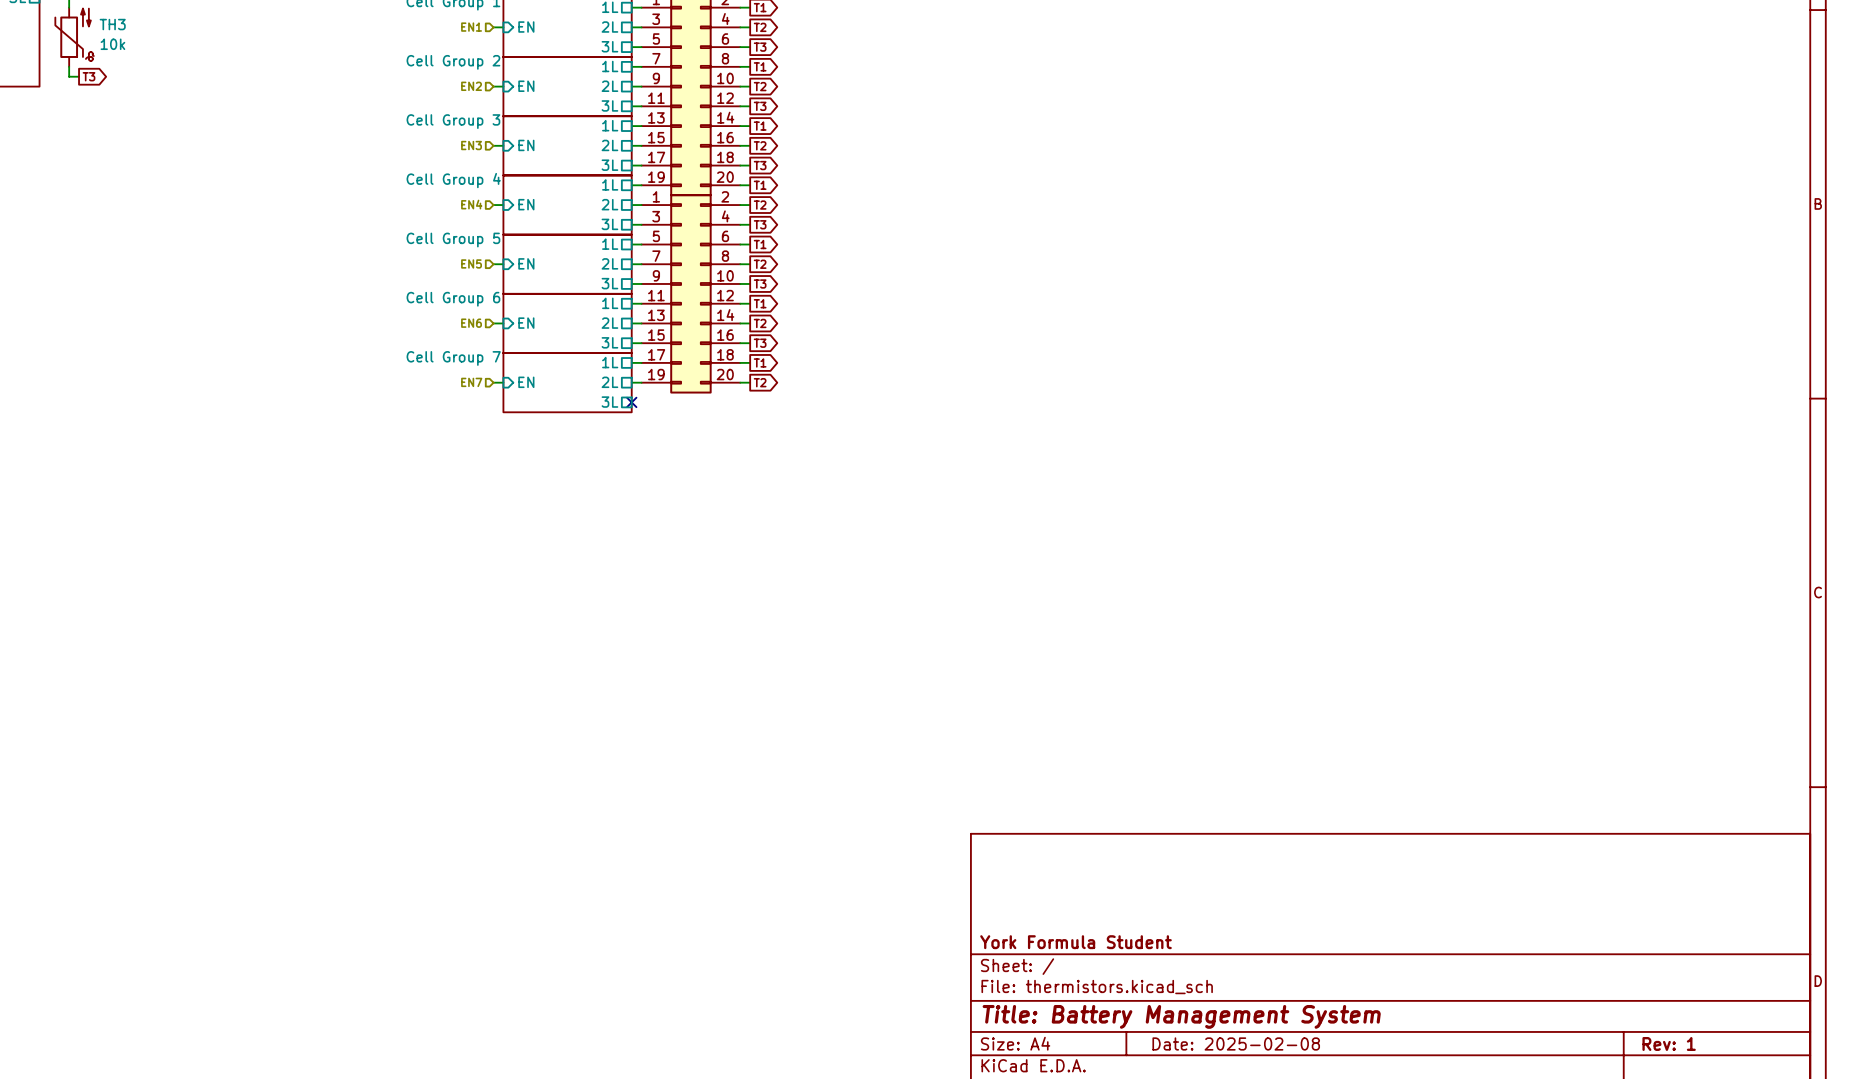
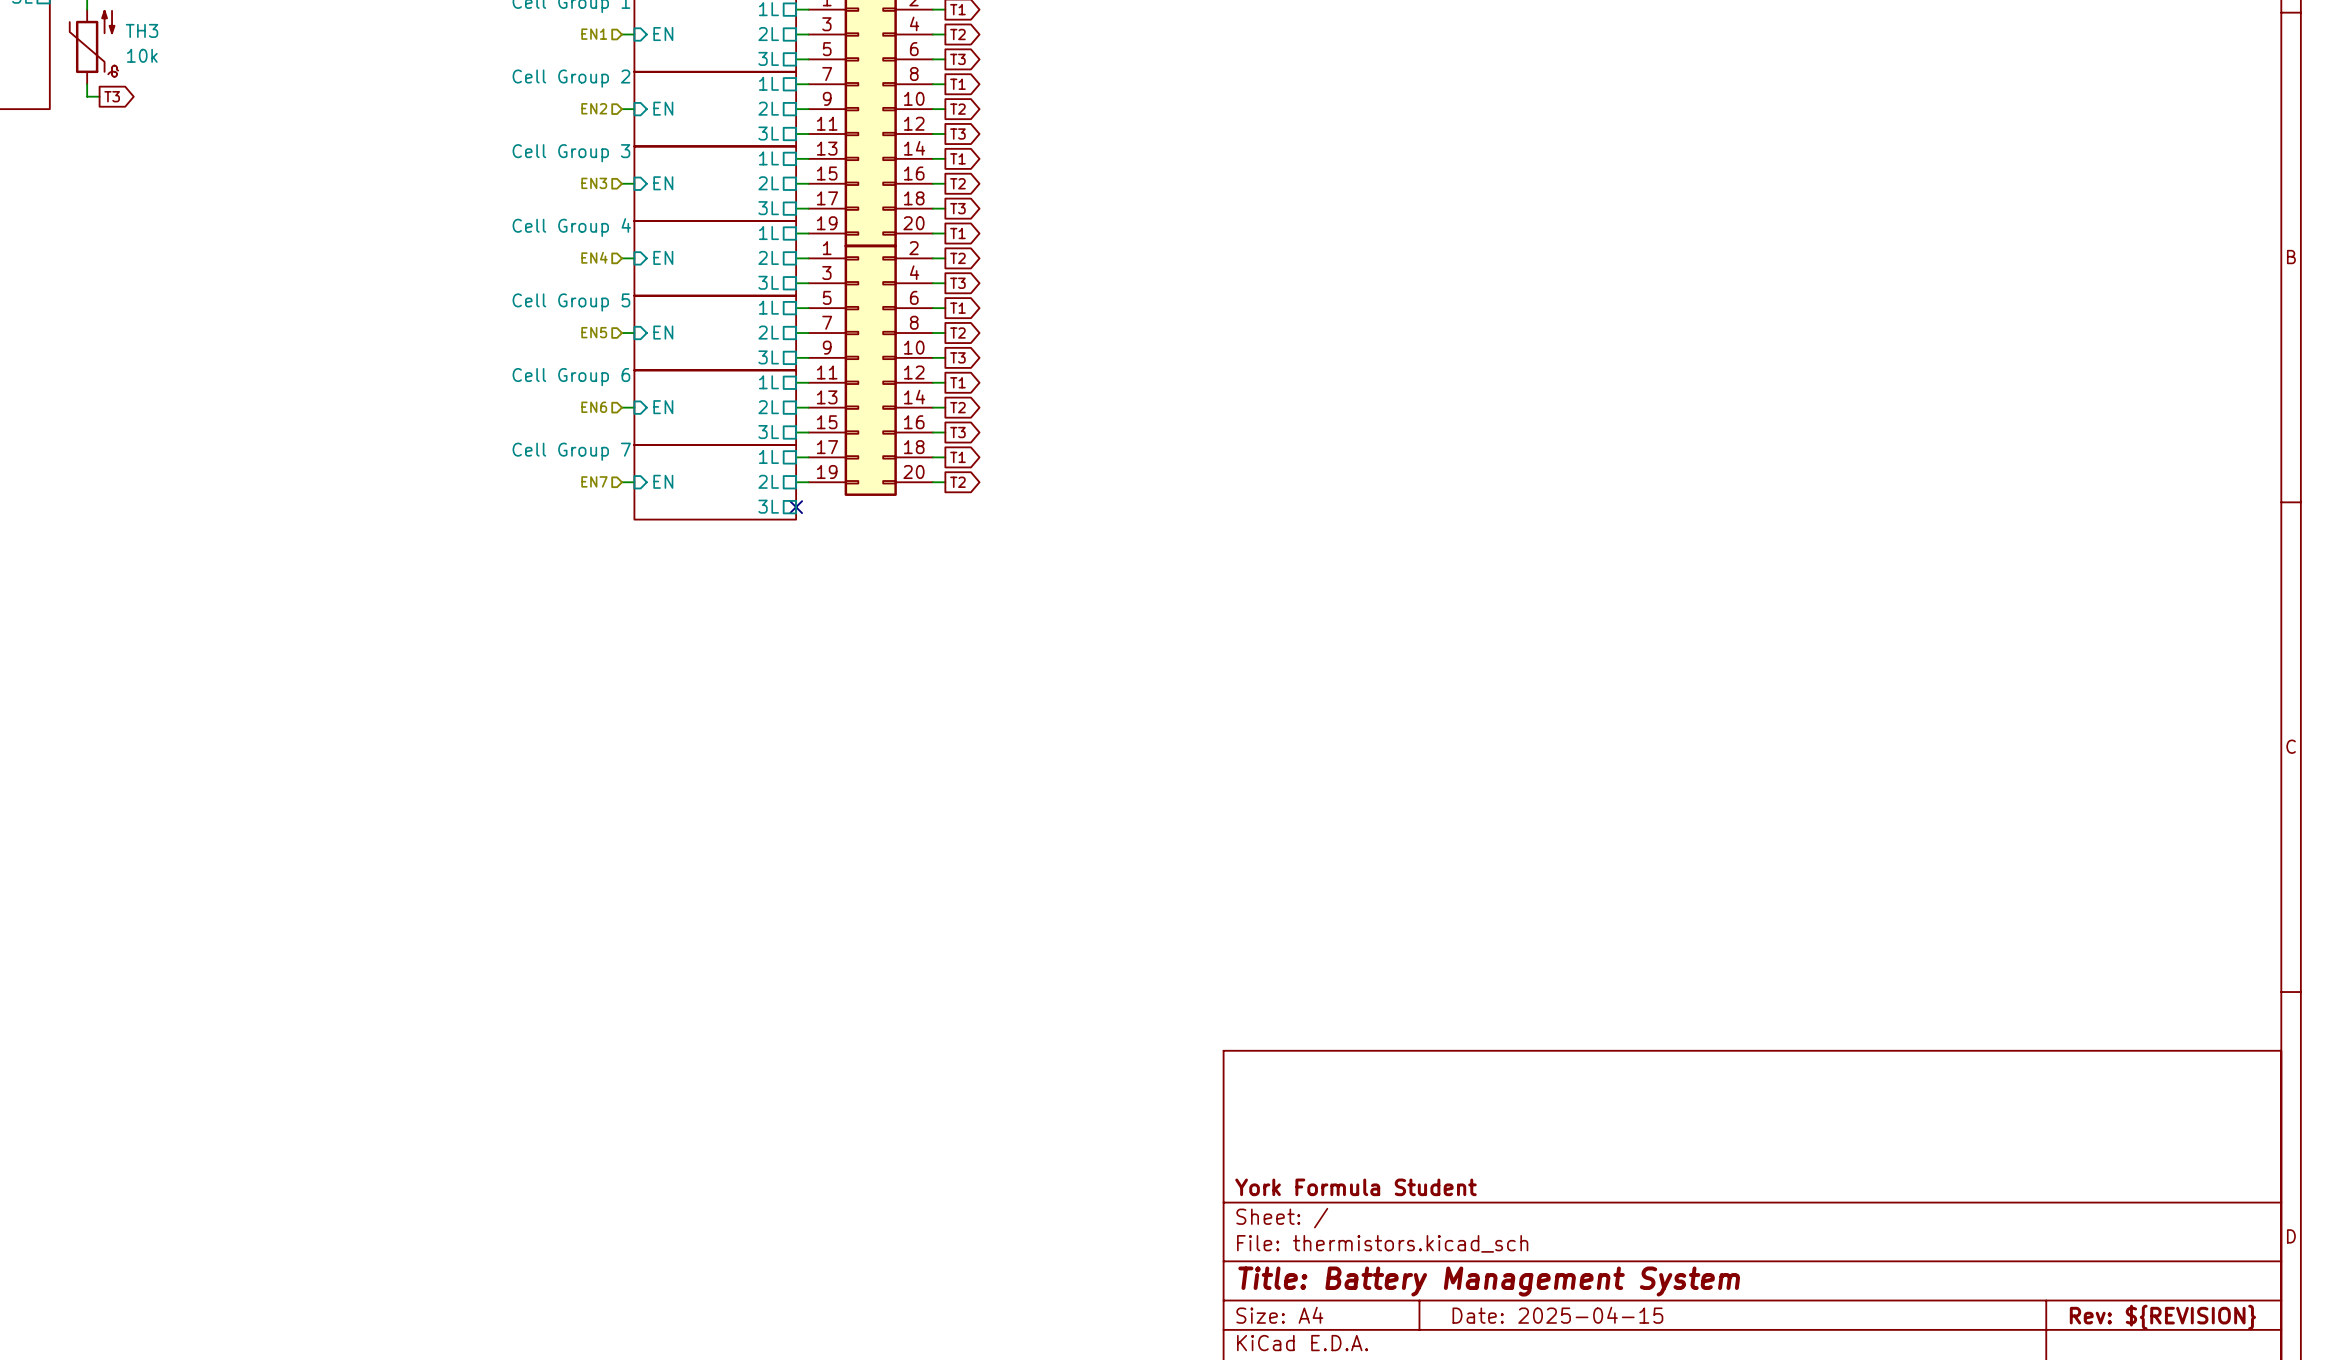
title block: Date: 2025-02-08 (1236, 1043) -> Date: 2025-04-15 (1557, 1315)
title block: Rev: 1 (1669, 1043) -> Rev: ${REVISION} (2162, 1317)

